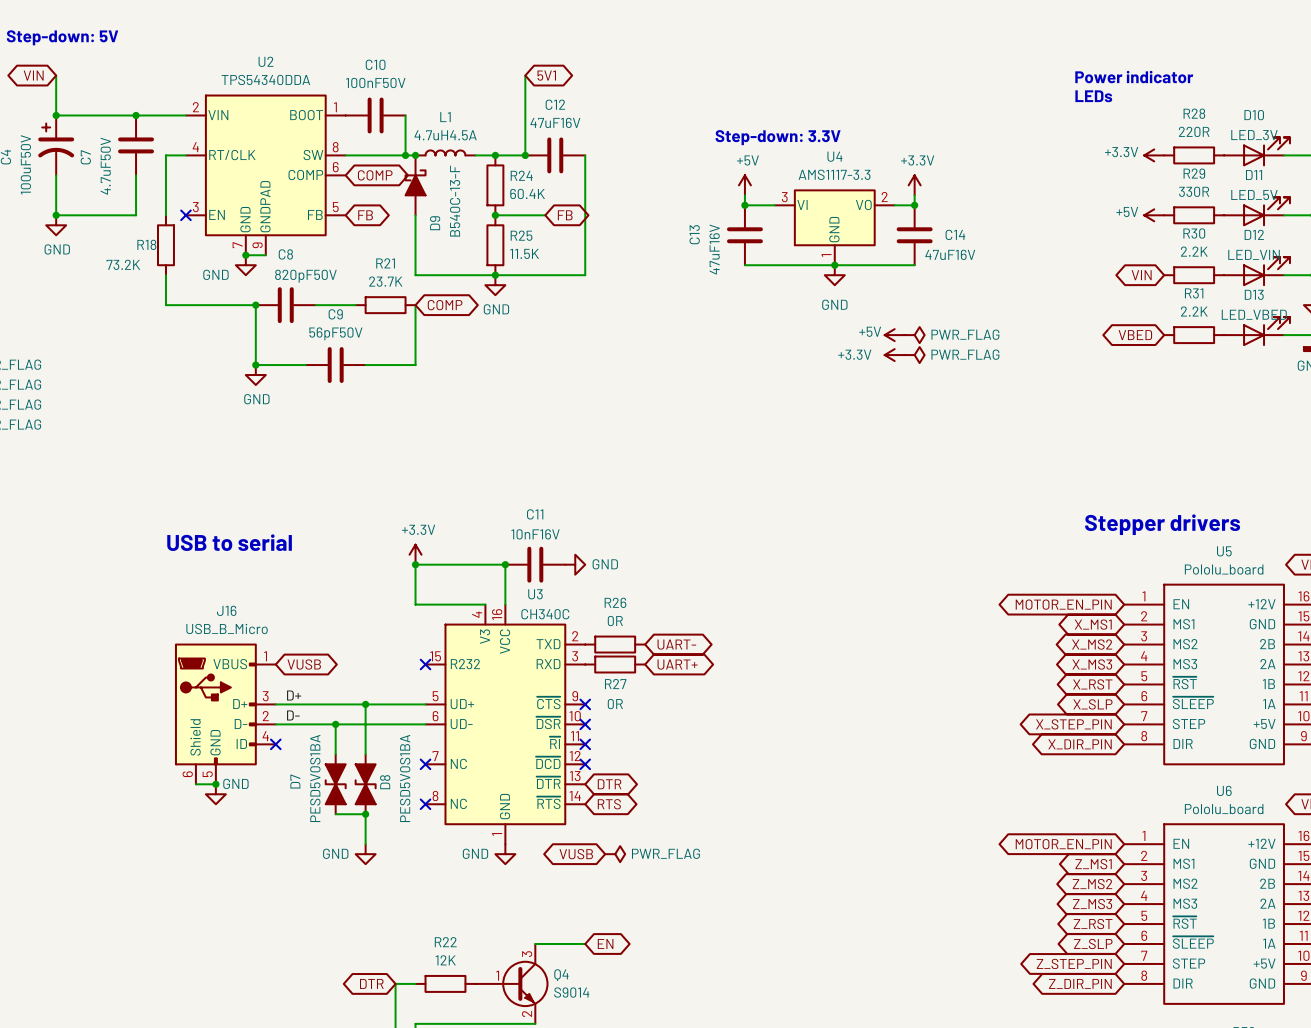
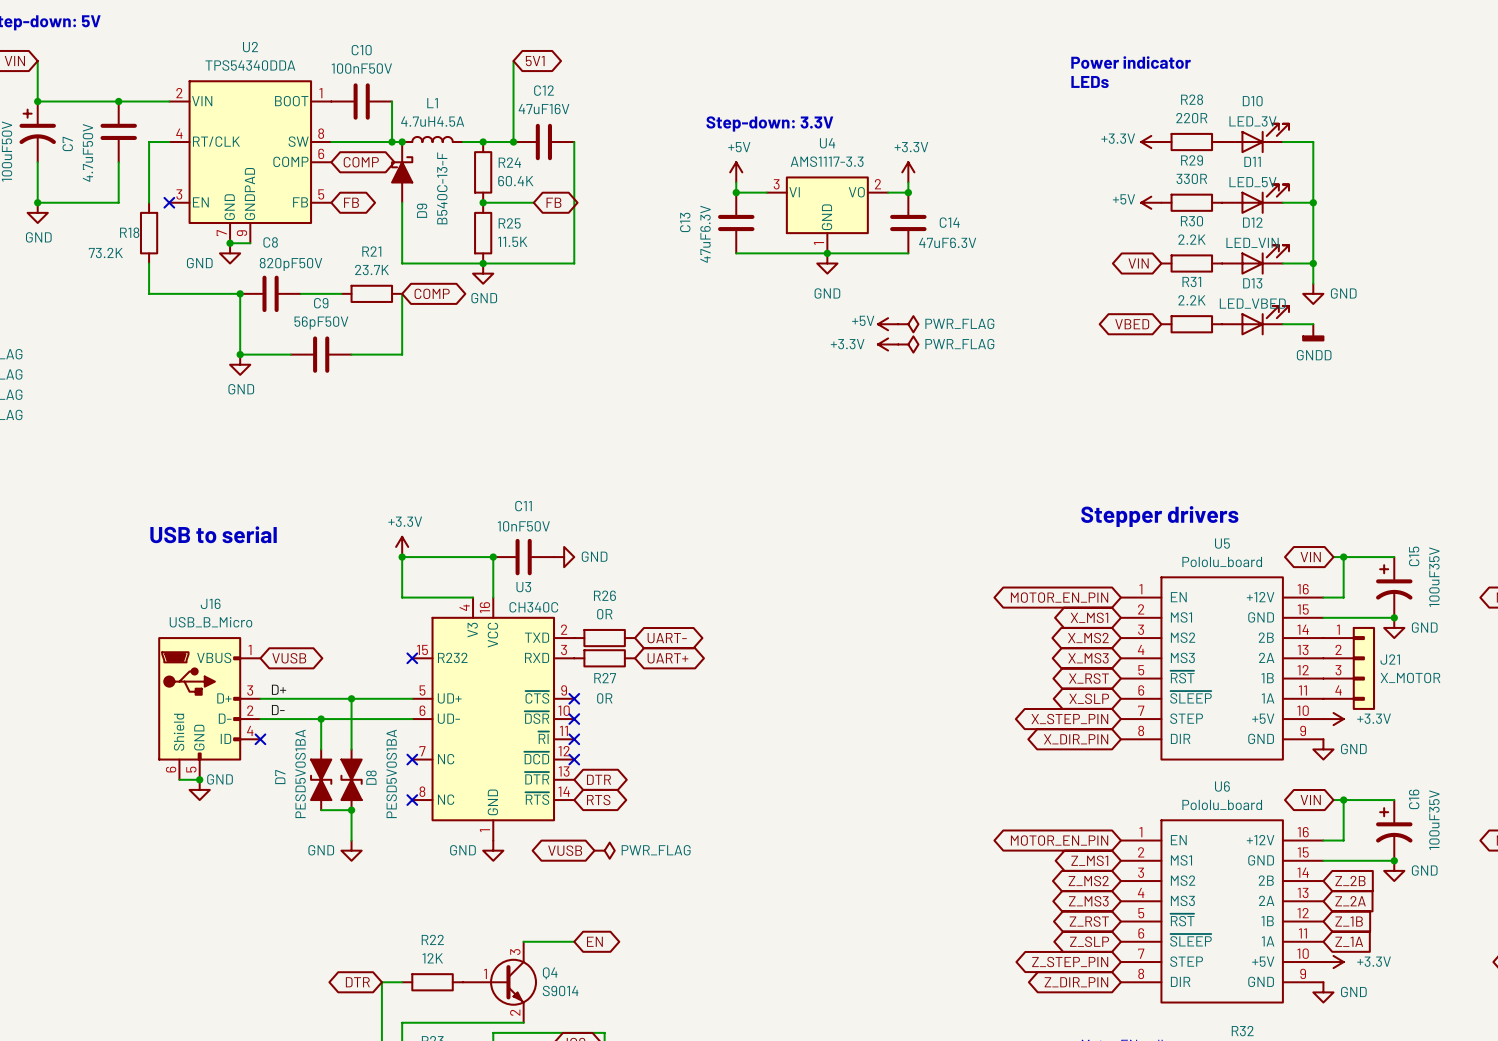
C13 value: 47uF16V (714, 249) -> 47uF6.3V (705, 234)
C14 value: 47uF16V (950, 254) -> 47uF6.3V (947, 242)
C11 value: 10nF16V (535, 534) -> 10nF50V (523, 526)

